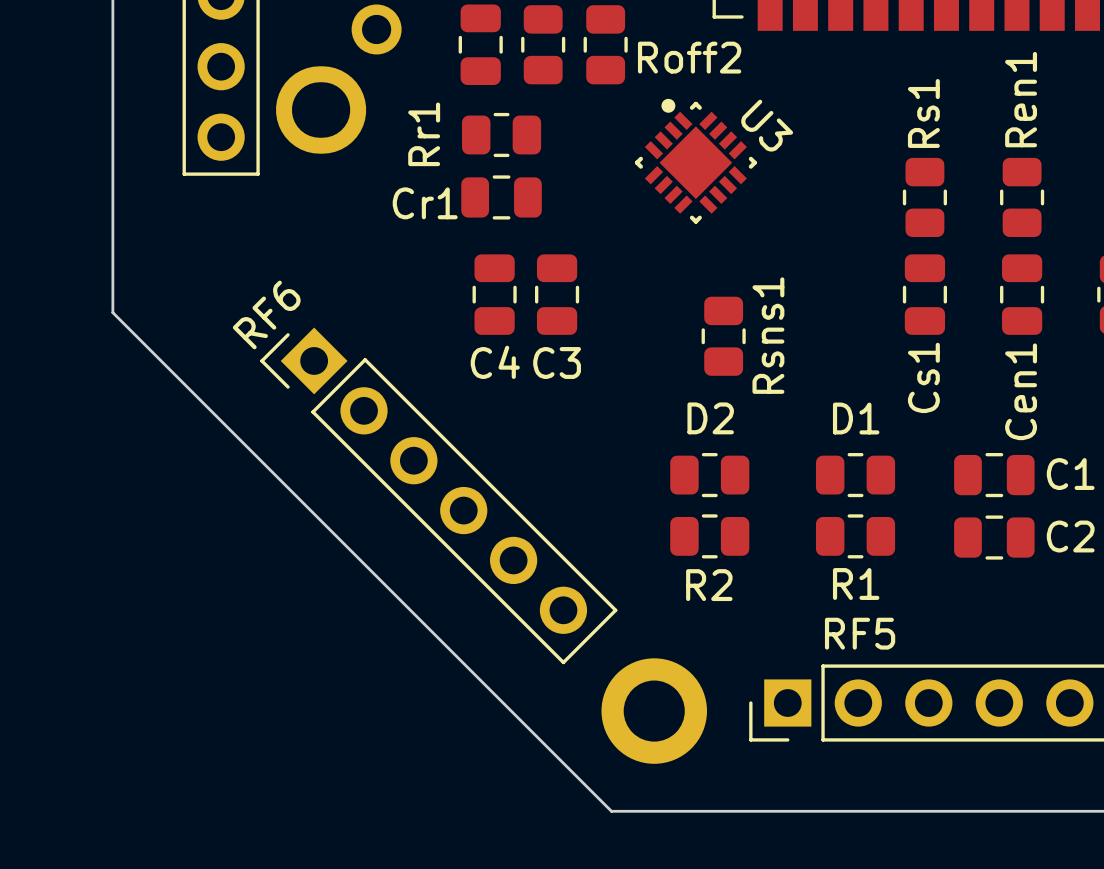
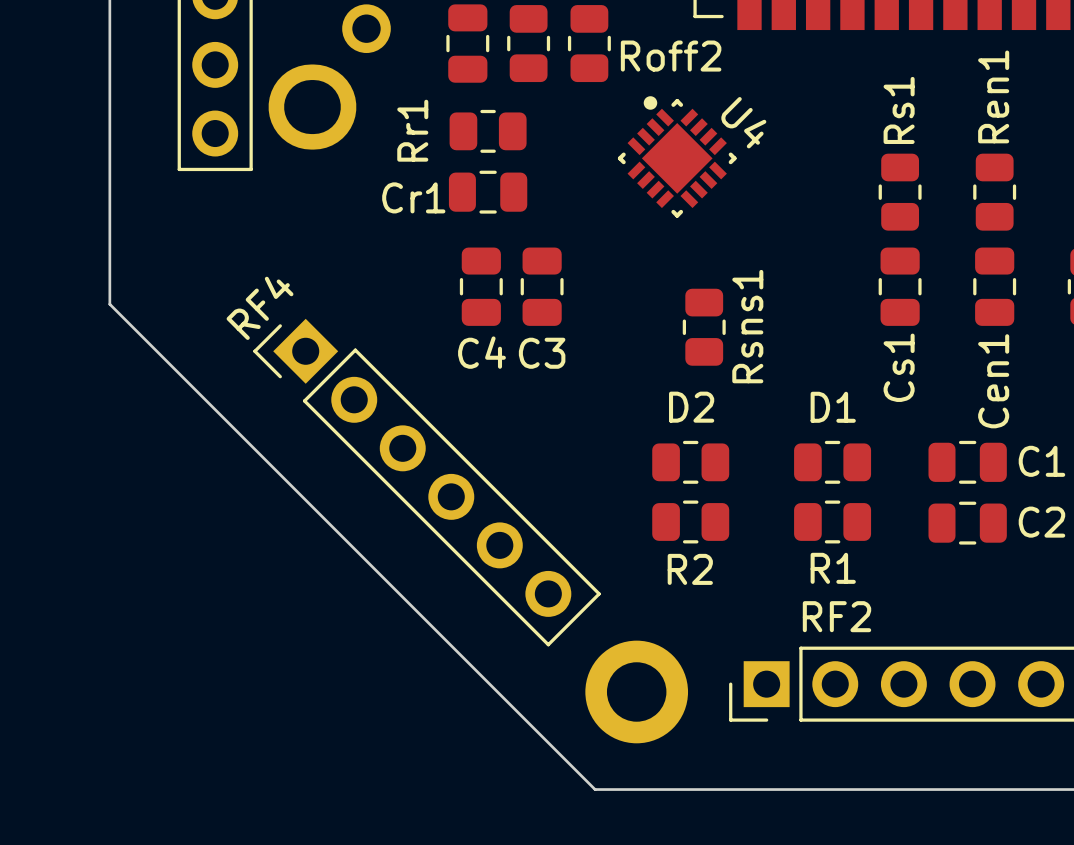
U3 name: U3 (767, 125) -> U4 (743, 122)
RF6 name: RF6 (266, 314) -> RF4 (260, 308)
RF5 name: RF5 (860, 633) -> RF2 (836, 616)

